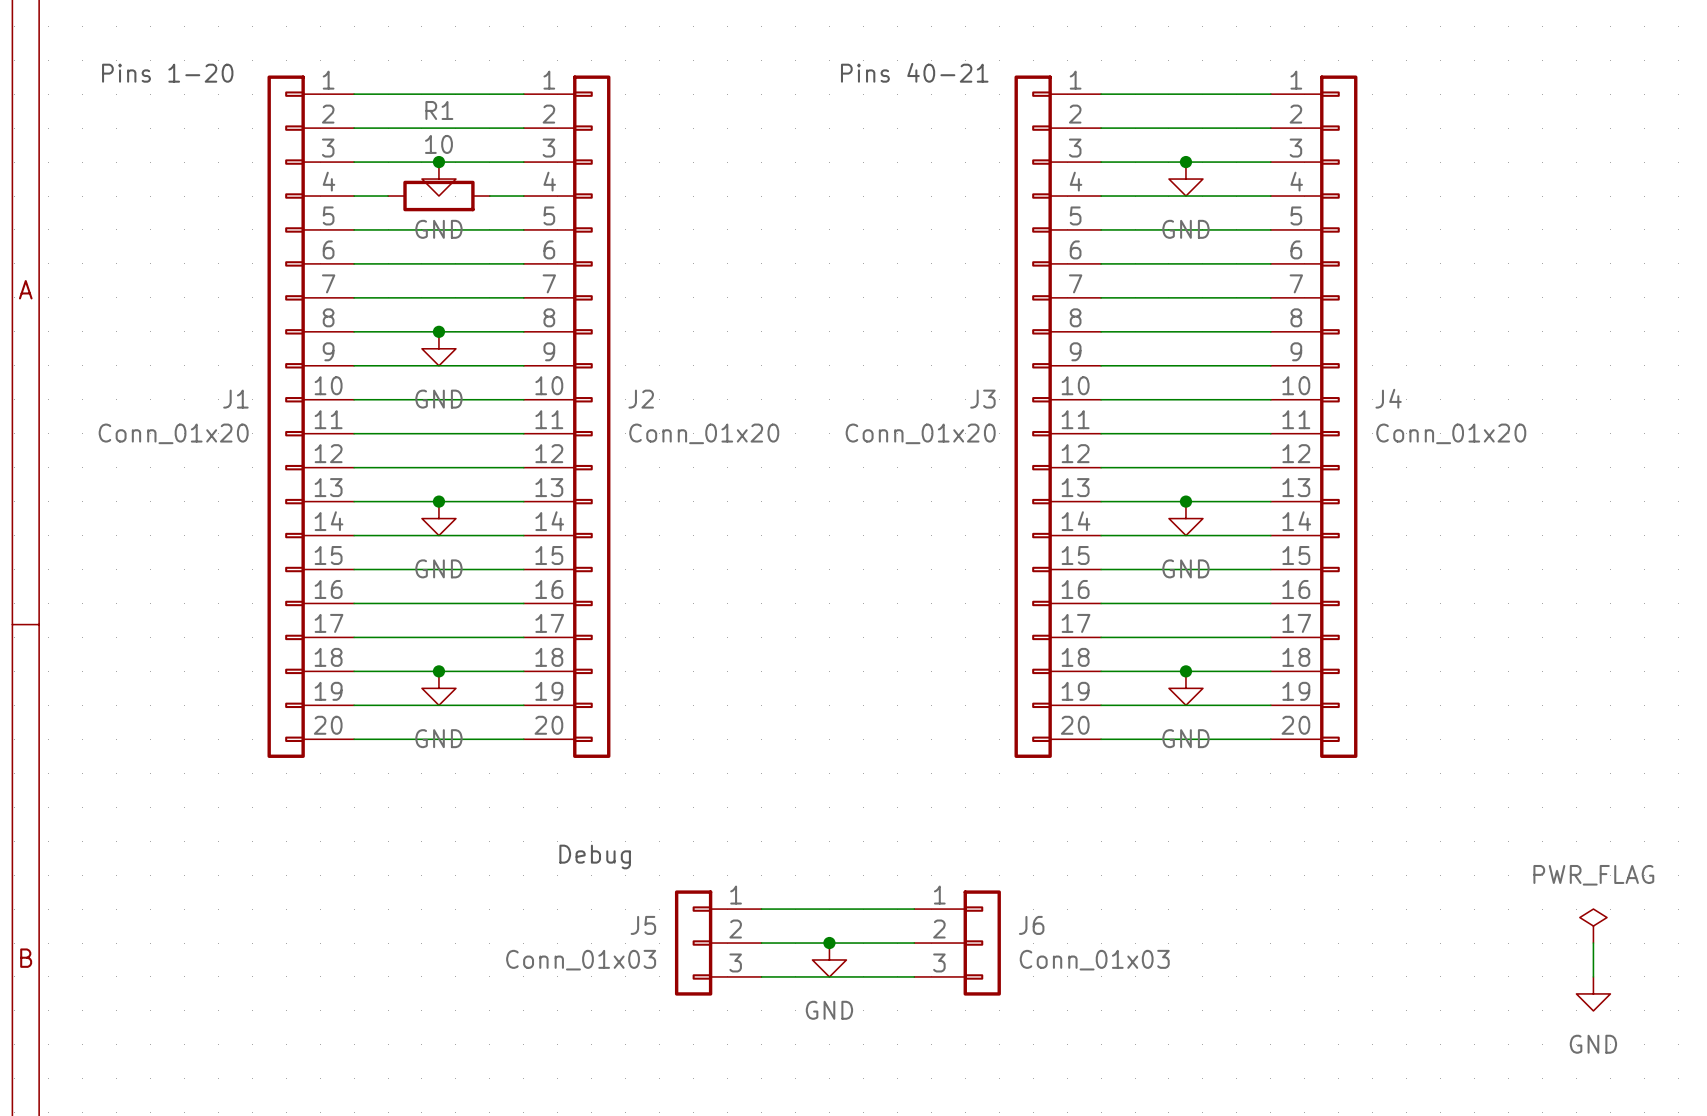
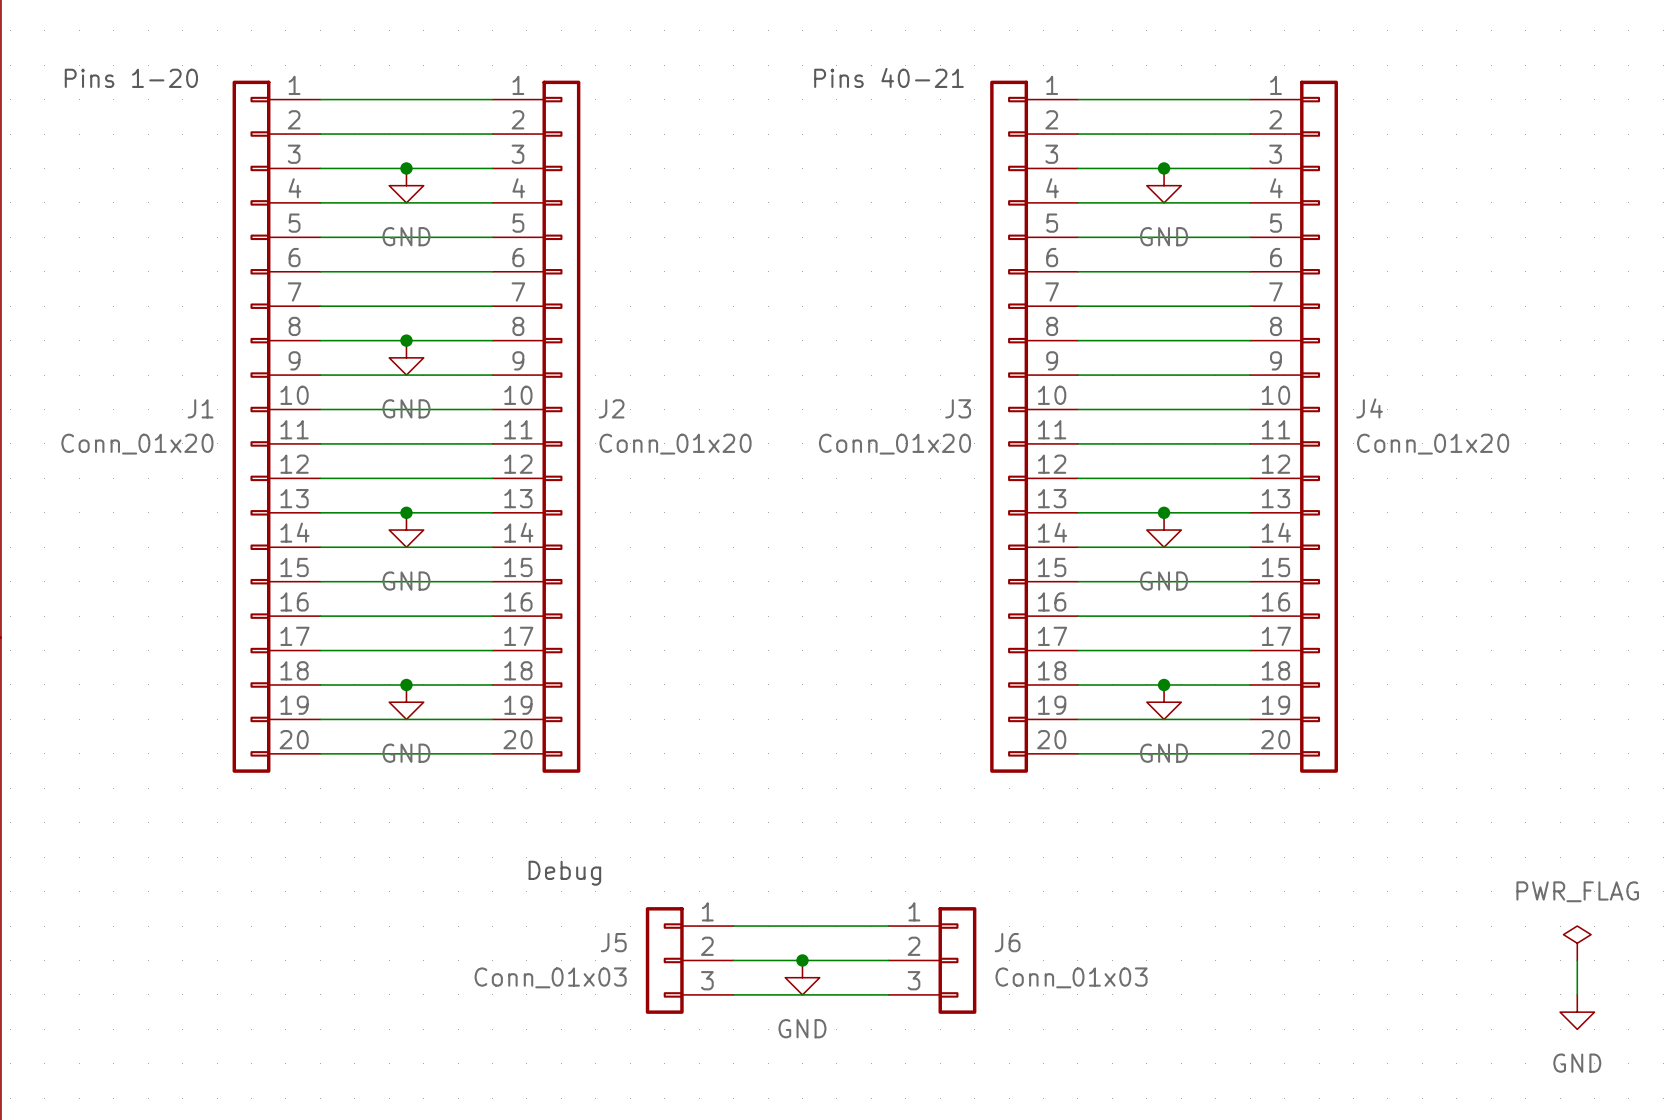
wire: none -> (354, 202) (458, 202)
R1: 10 (438, 196) -> none

